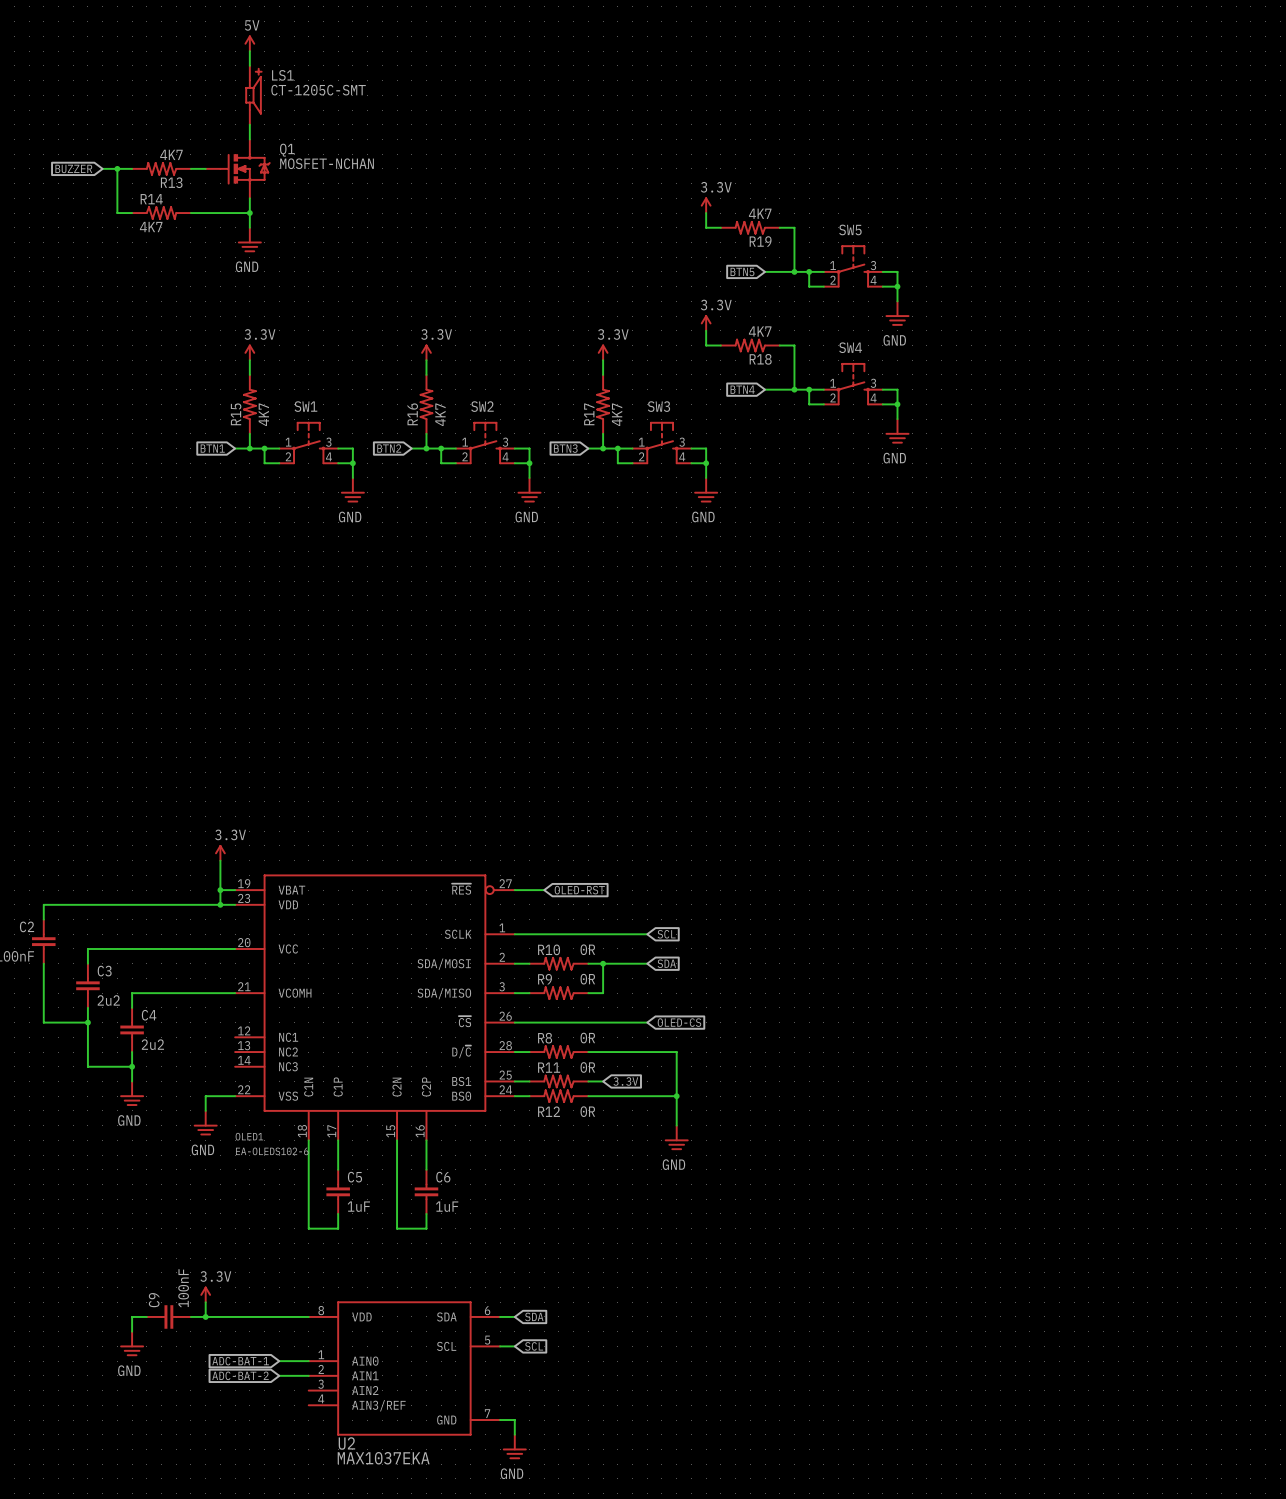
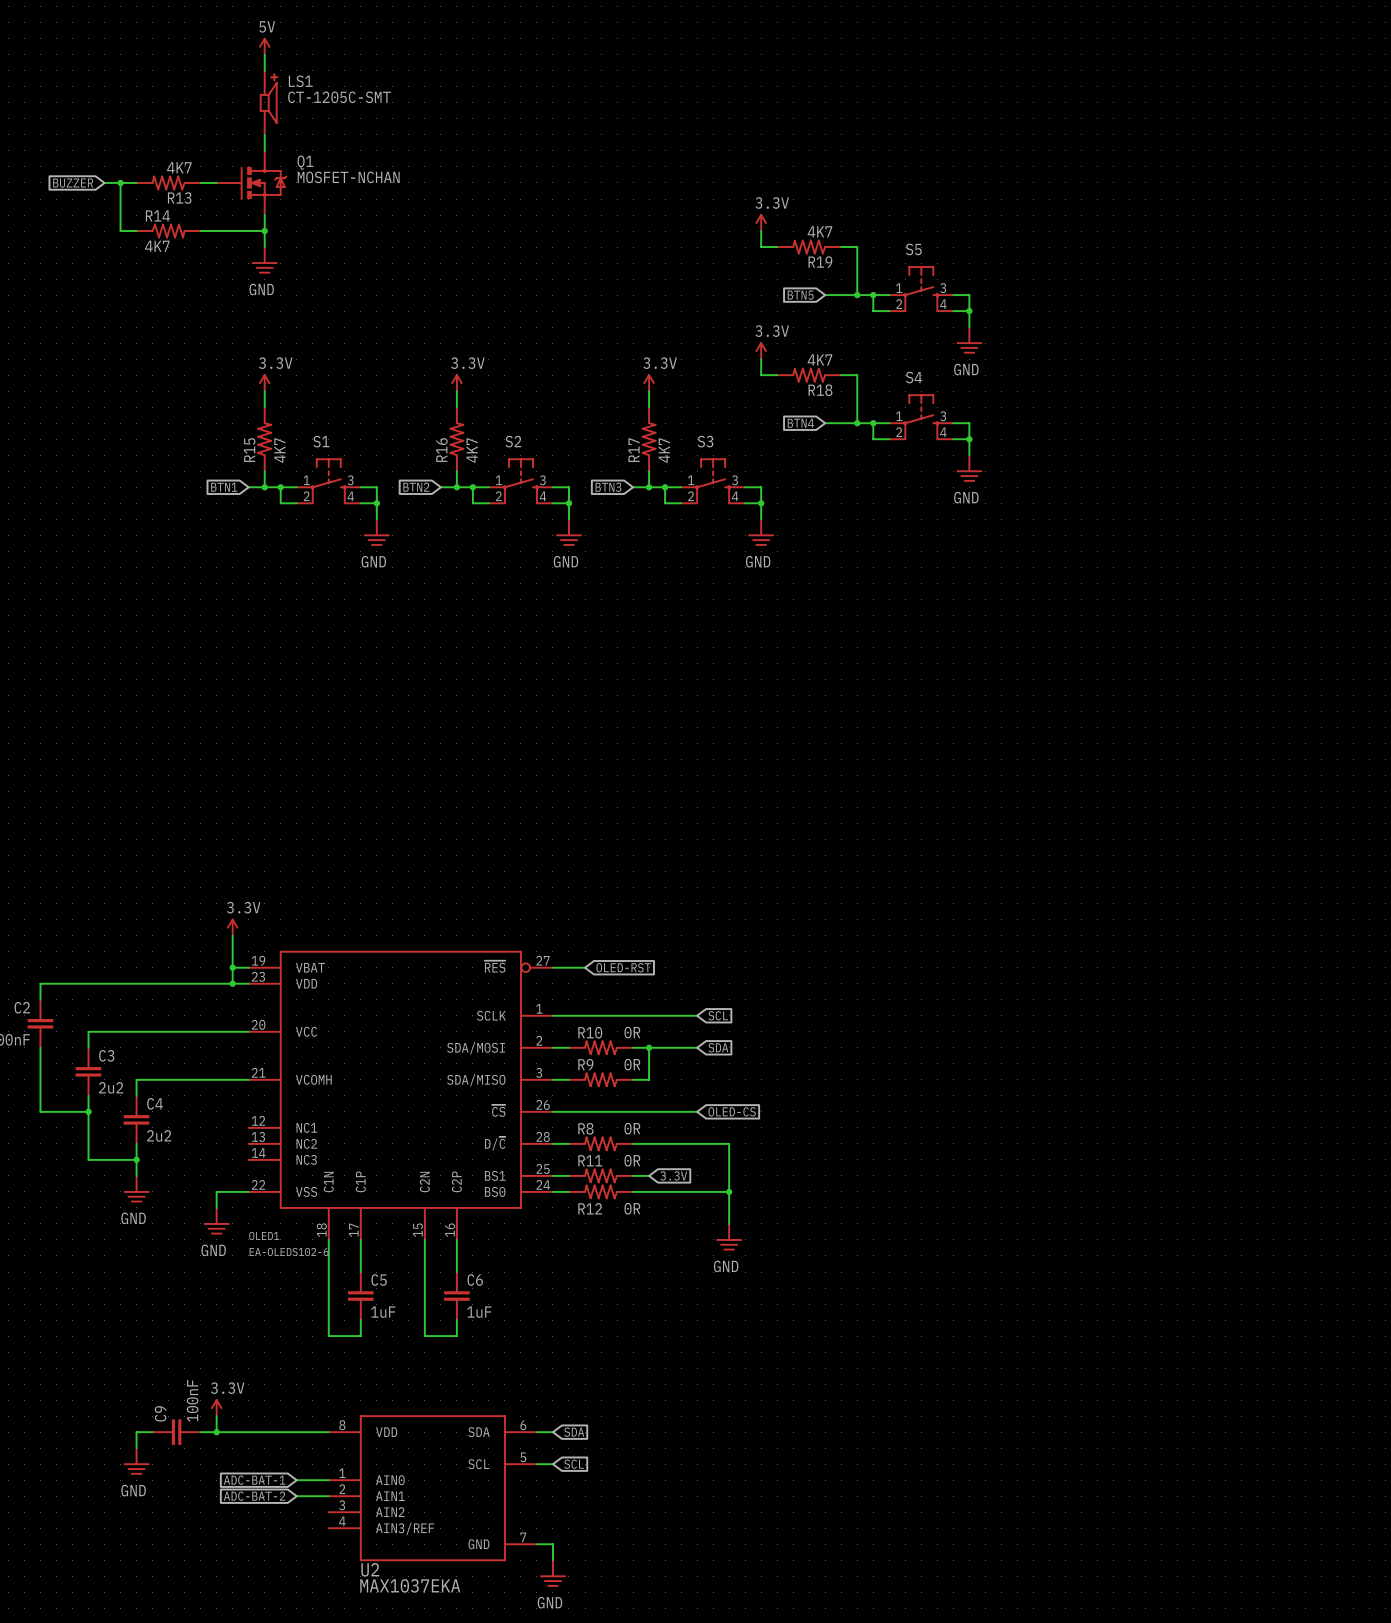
SW5 name: SW5 (850, 229) -> S5 (913, 249)
SW4 name: SW4 (850, 347) -> S4 (914, 377)
SW1 name: SW1 (305, 406) -> S1 (321, 441)
SW2 name: SW2 (482, 406) -> S2 (513, 441)
SW3 name: SW3 (658, 406) -> S3 (705, 441)

